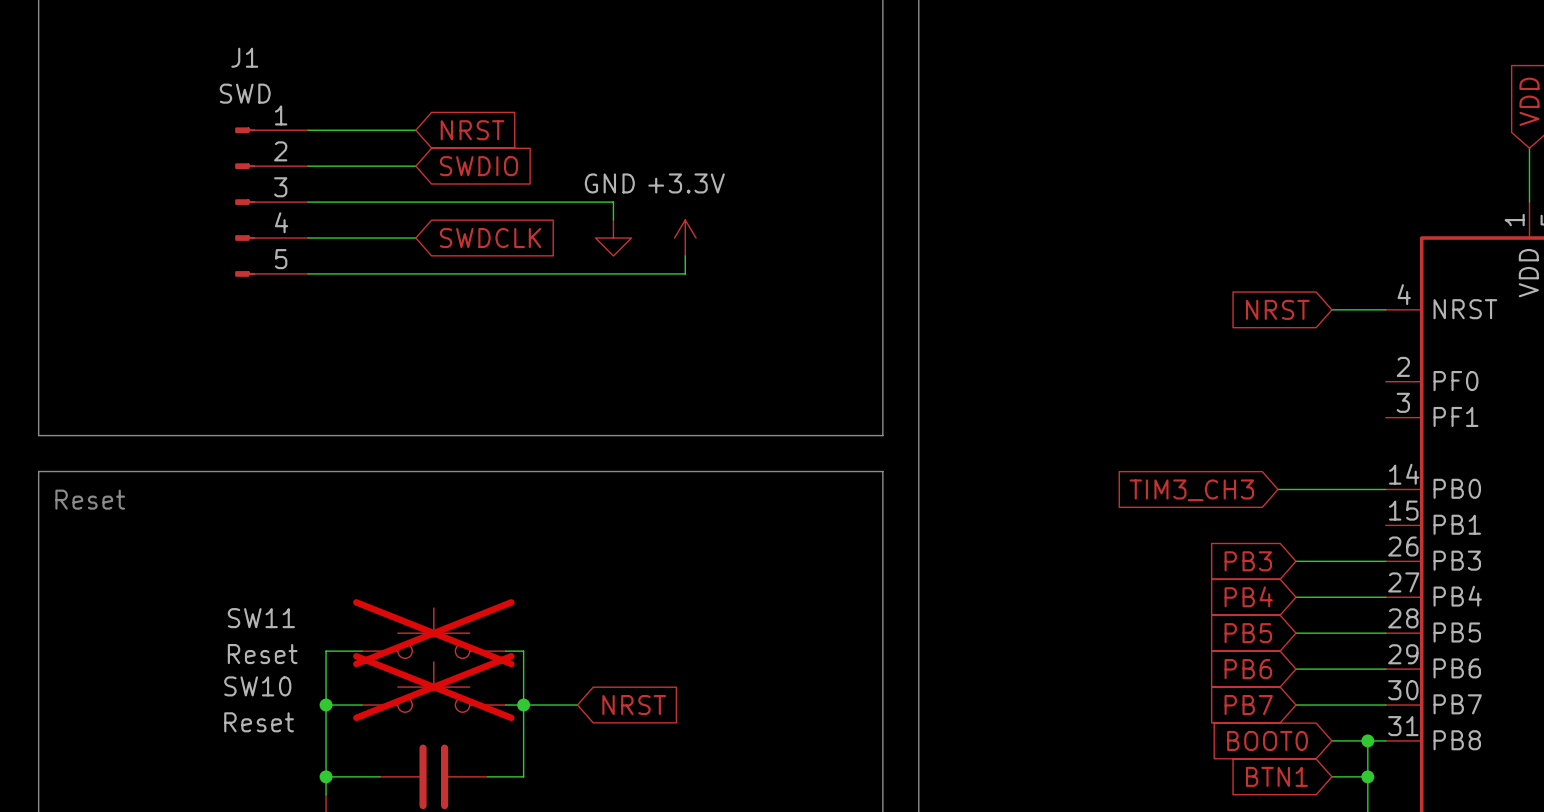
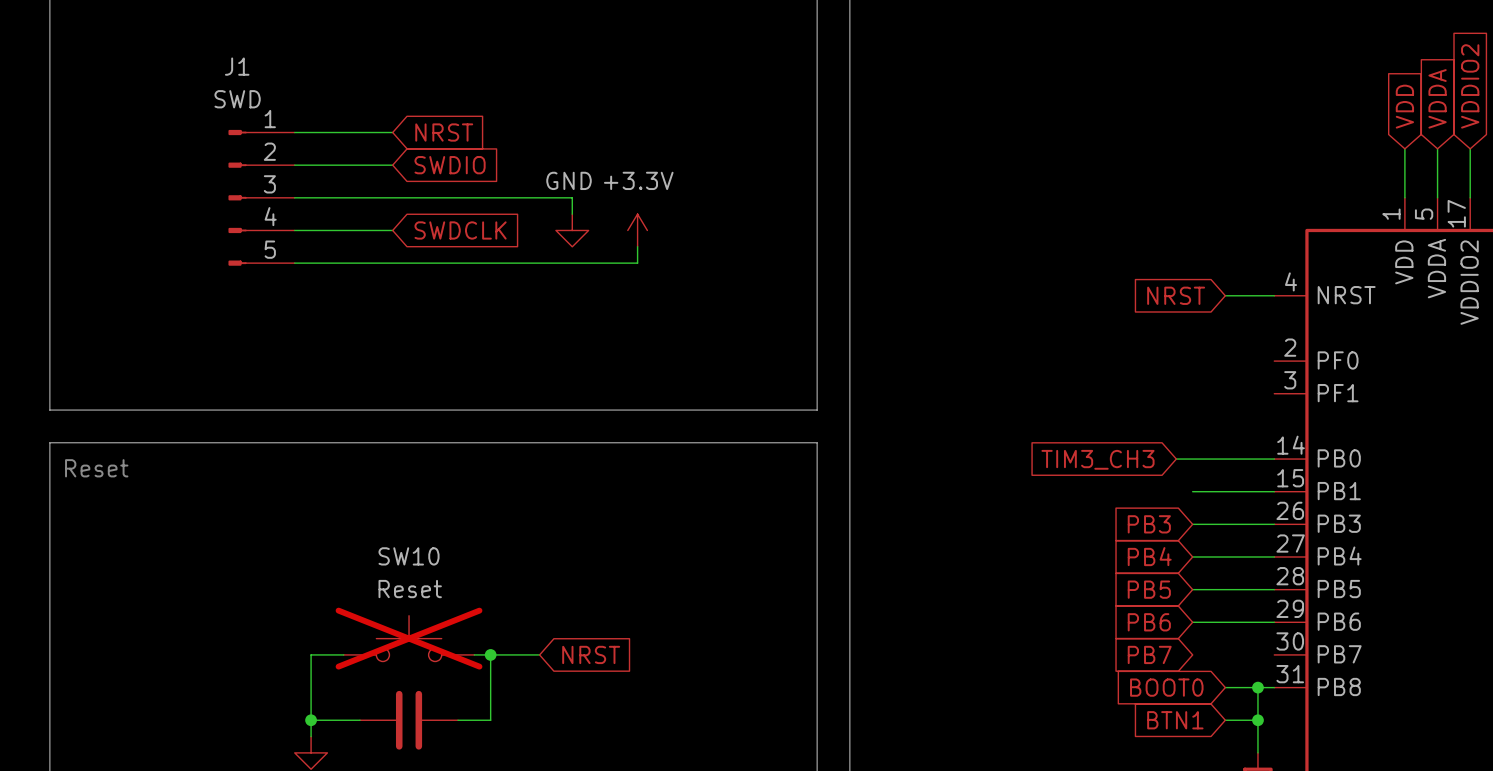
SW11: Reset (433, 633) -> none
wire: (361, 651) (326, 651) (326, 705) -> none
wire: (505, 651) (523, 651) (523, 705) -> none
SW10 name position: SW10 (257, 686) -> SW10 (409, 556)
junction: (326, 705) -> none
wire: (1295, 705) (1385, 705) -> (1192, 491) (1274, 491)
SW10 value position: Reset (259, 722) -> Reset (410, 589)

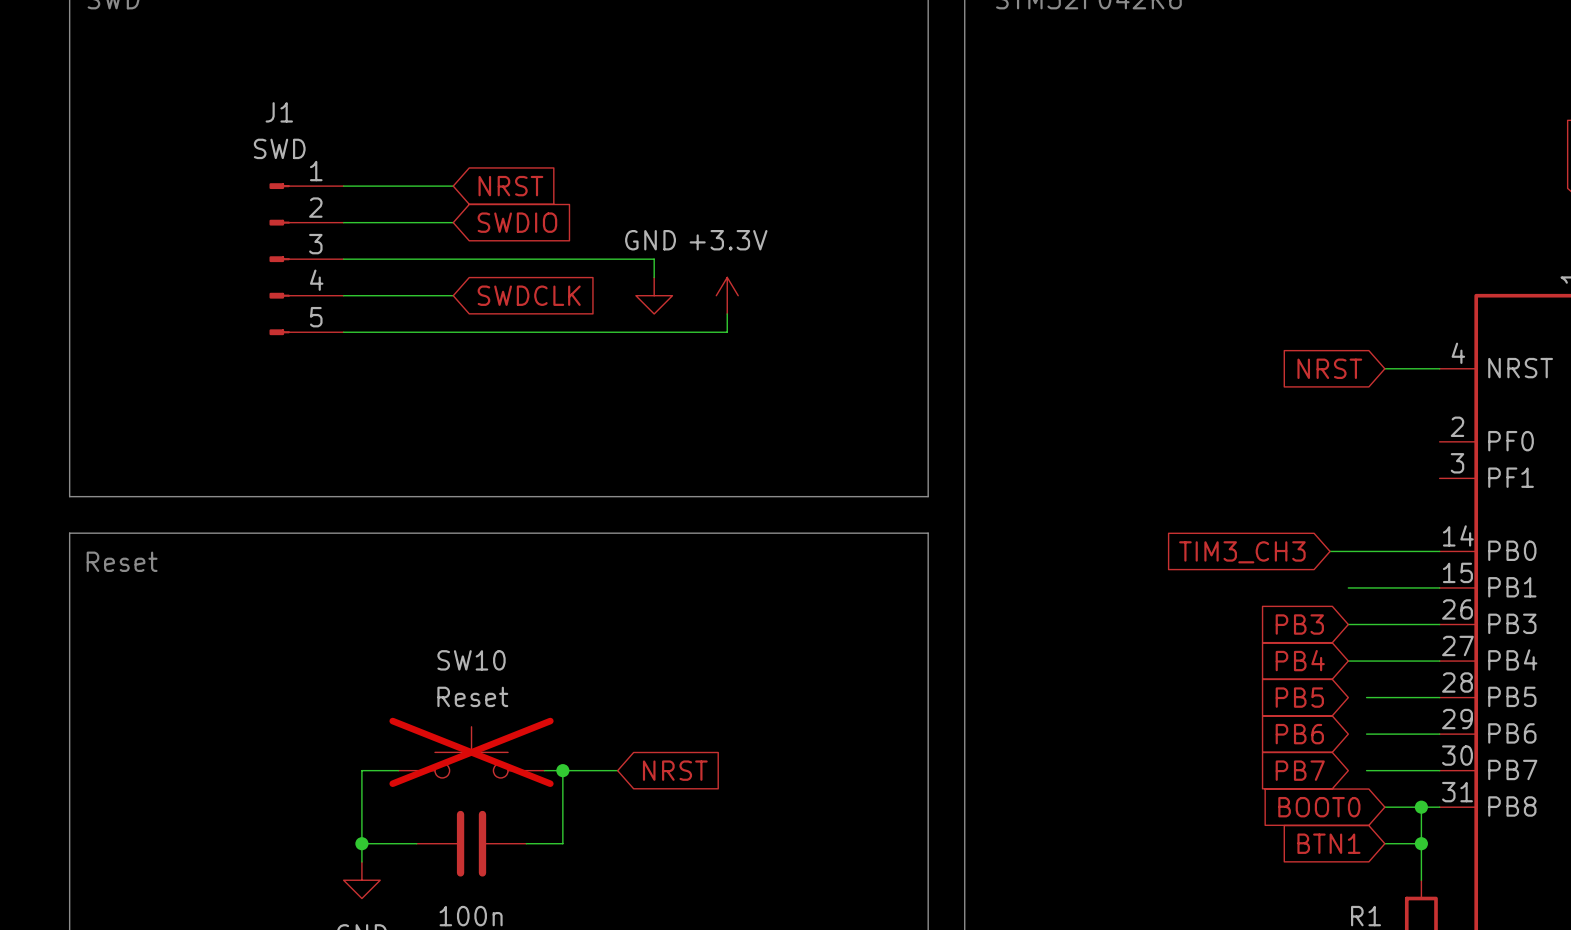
wire: (1192, 589) (1209, 589) -> none
wire: (1192, 622) (1209, 622) -> none
wire: none -> (1366, 770) (1439, 770)

